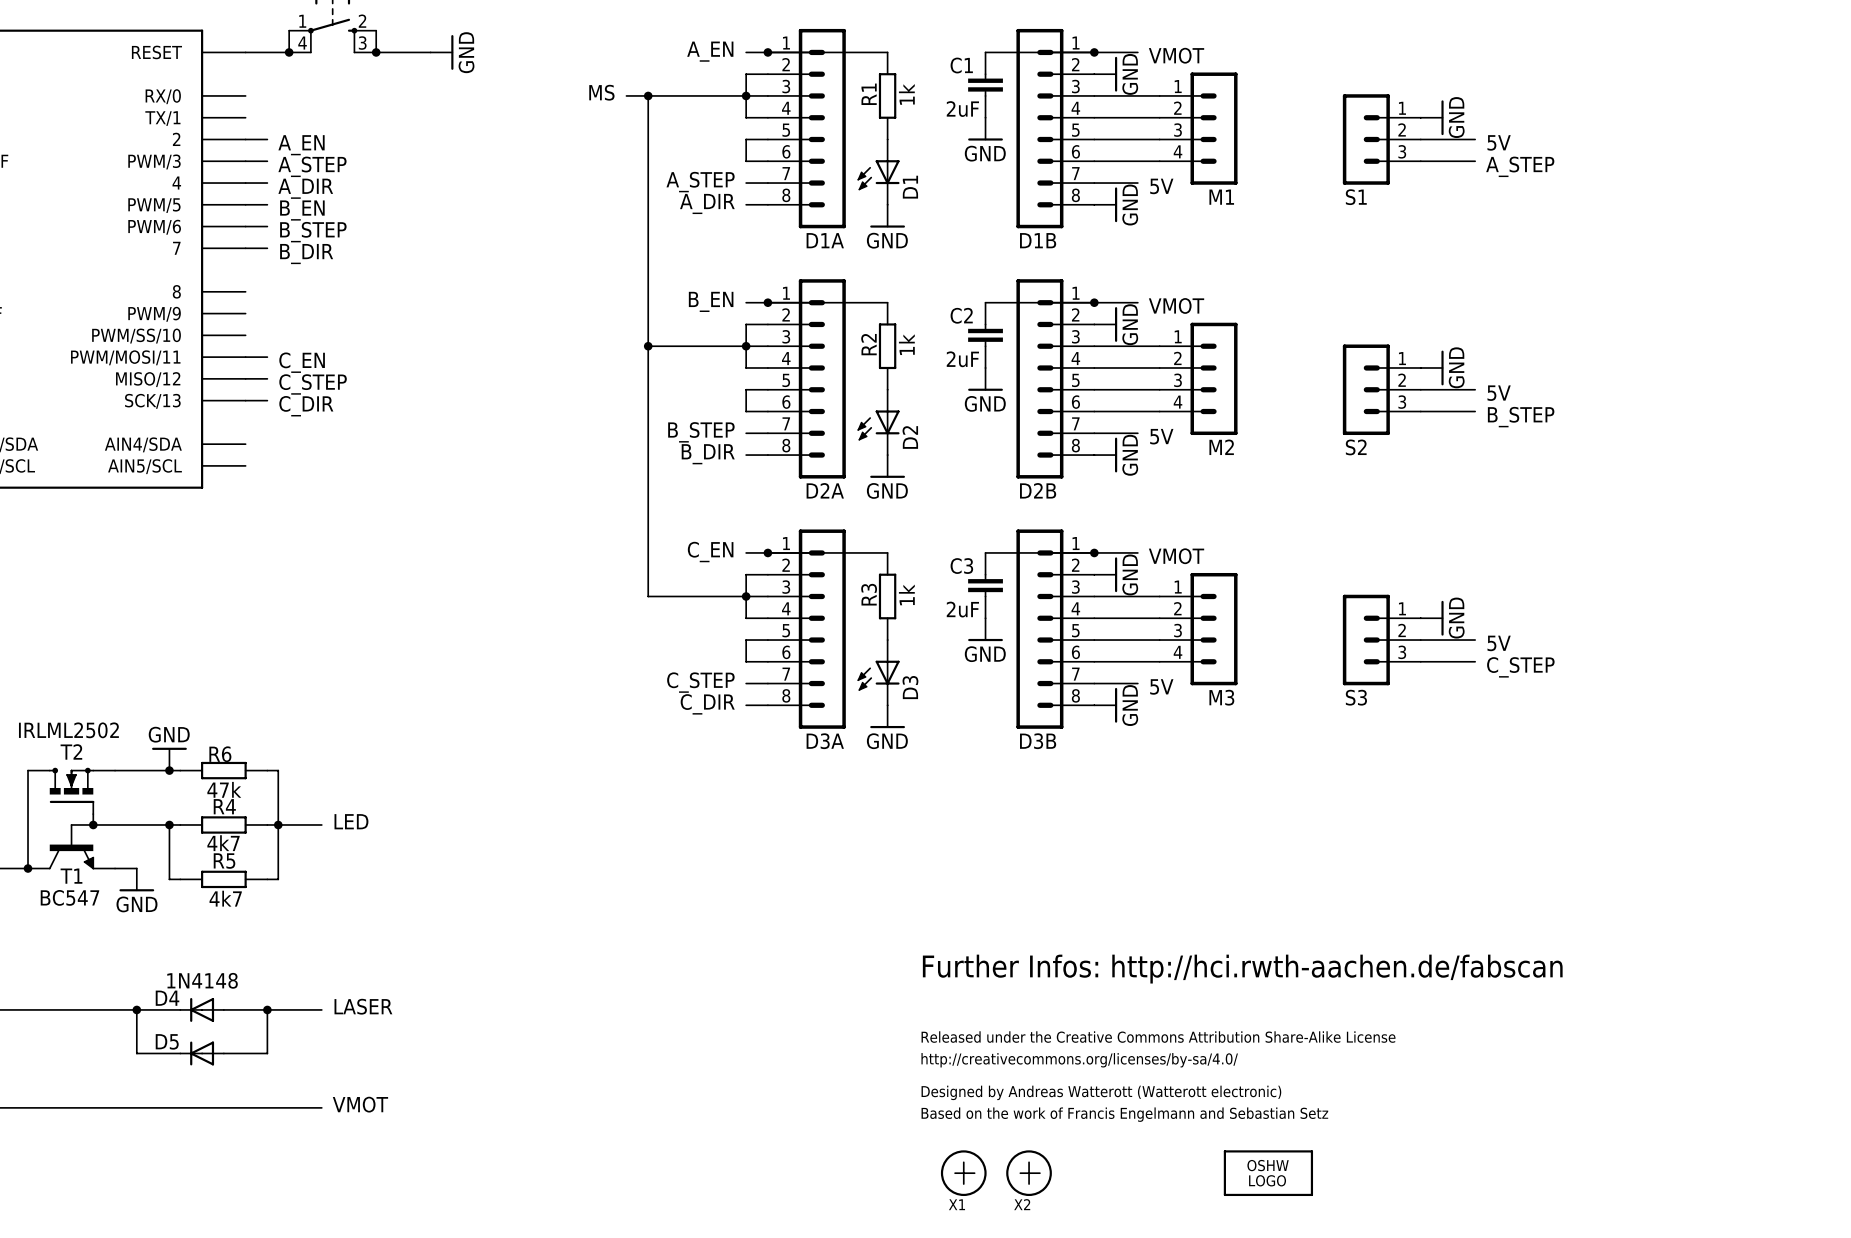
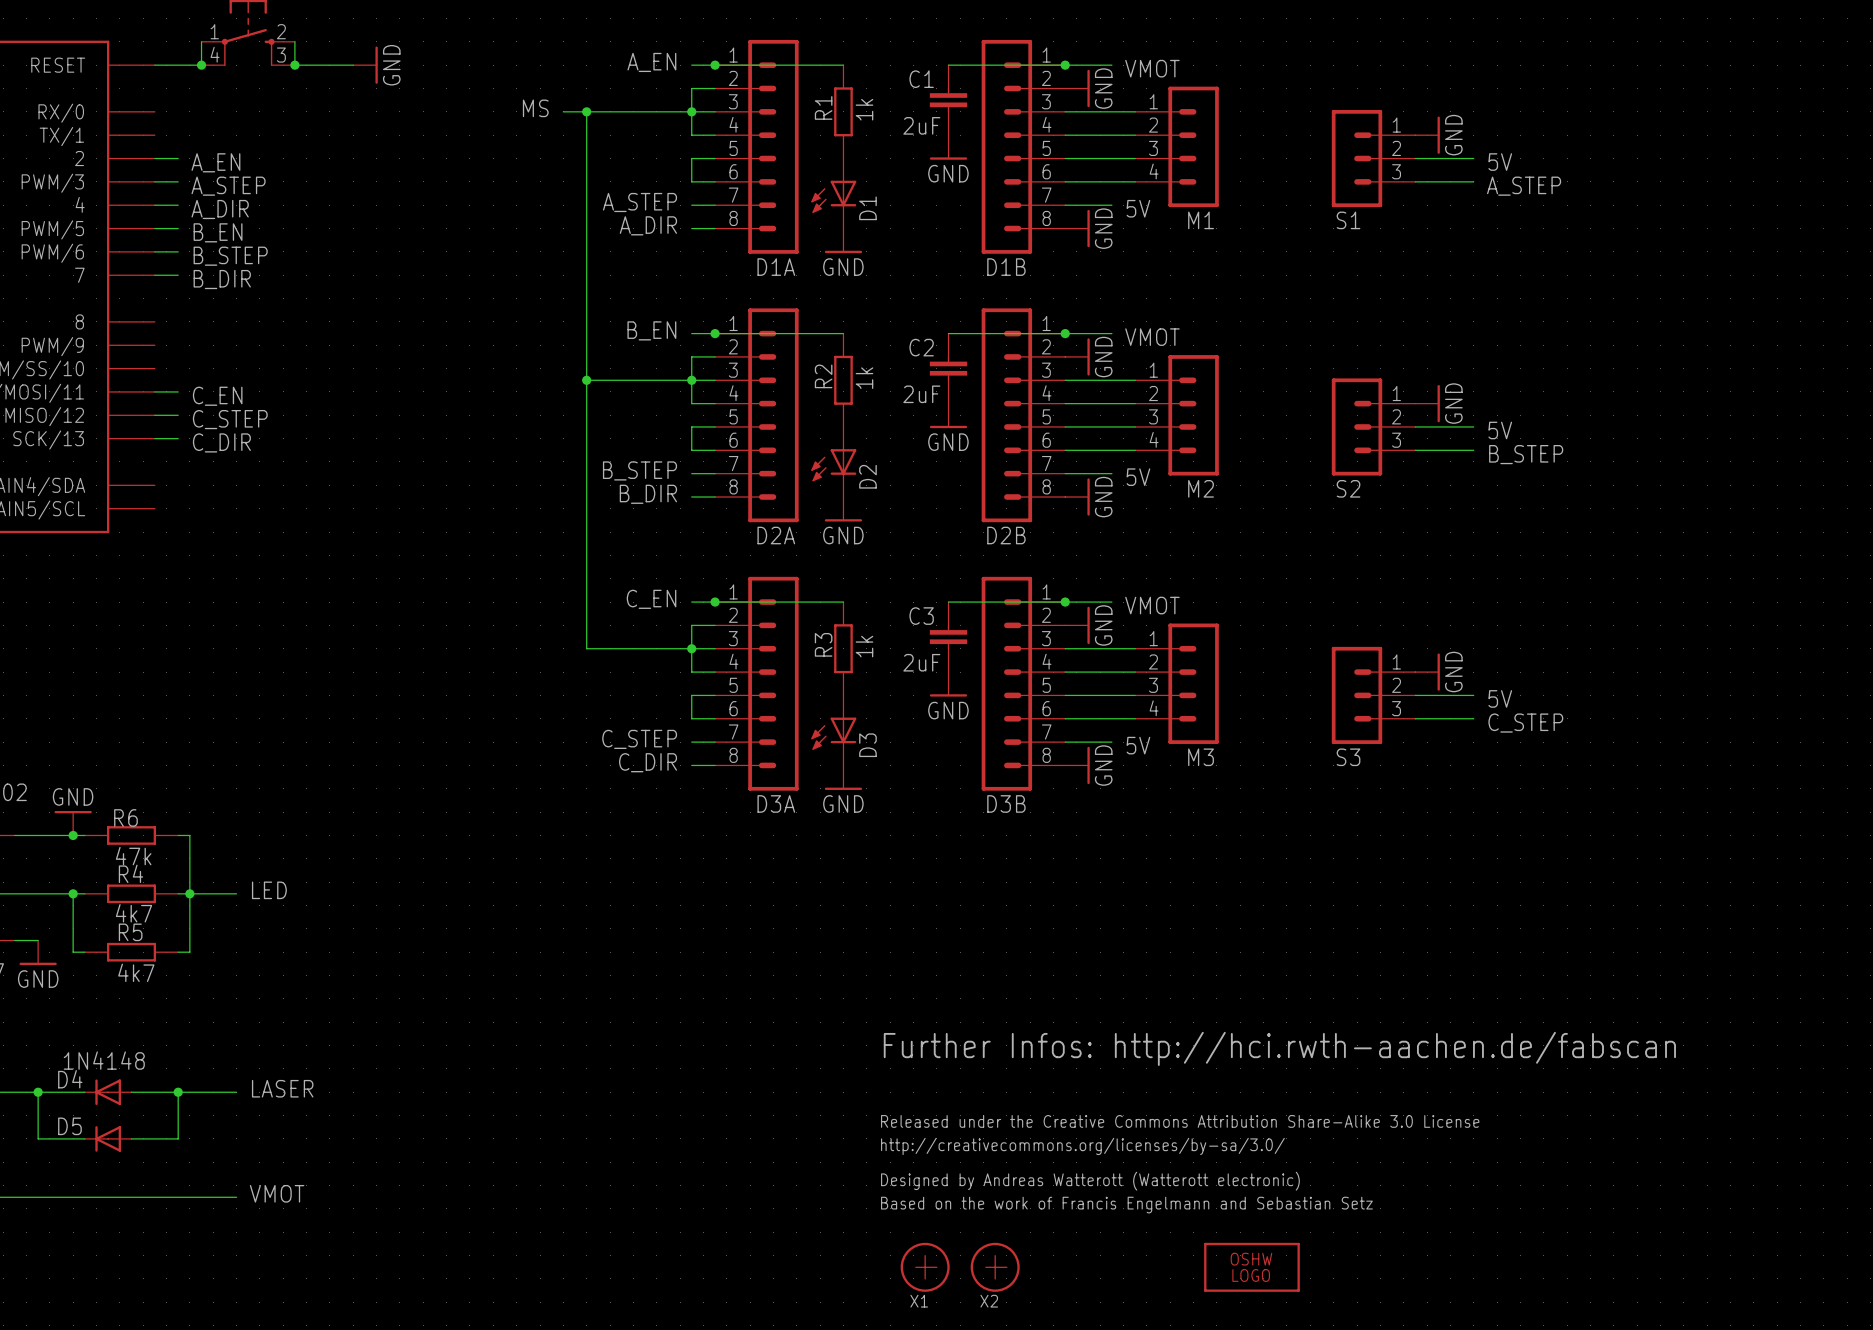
text: Released under the Creative Commons Attribution Share-Alike License (1158, 1037) -> Released under the Creative Commons Attribution Share-Alike 3.0 License (1180, 1121)
text: http://creativecommons.org/licenses/by-sa/4.0/ (1079, 1060) -> http://creativecommons.org/licenses/by-sa/3.0/ (1082, 1146)

